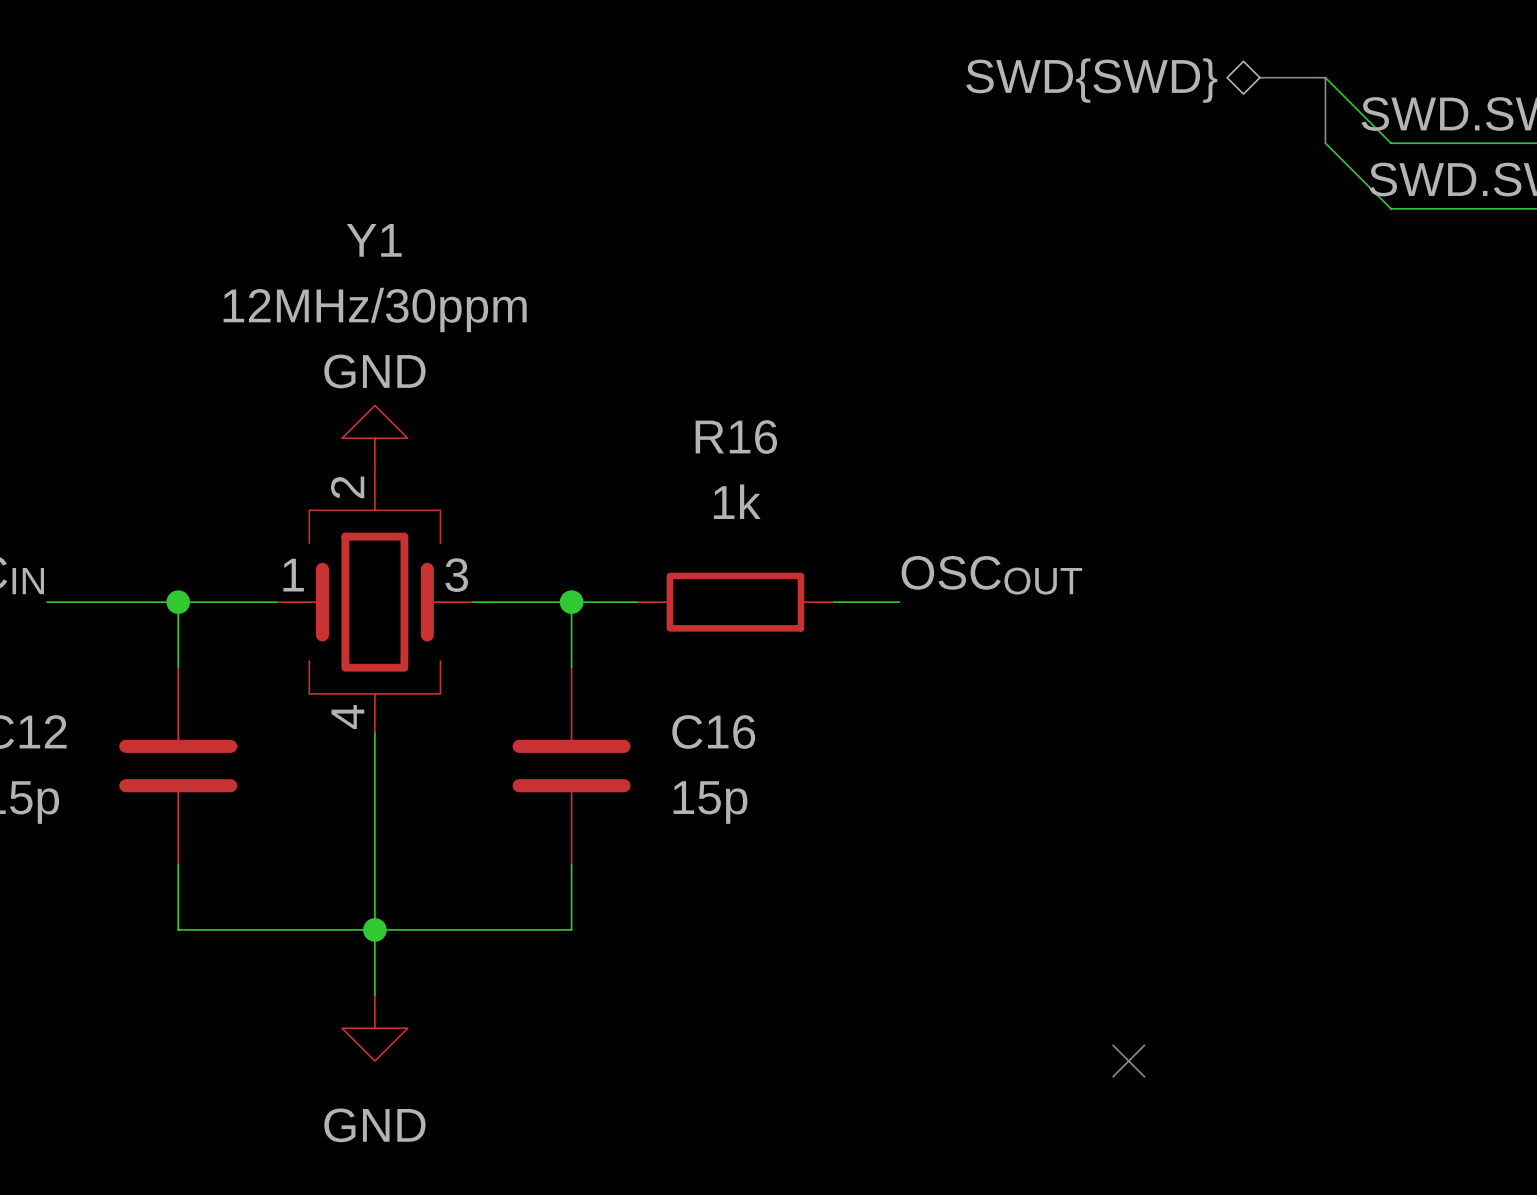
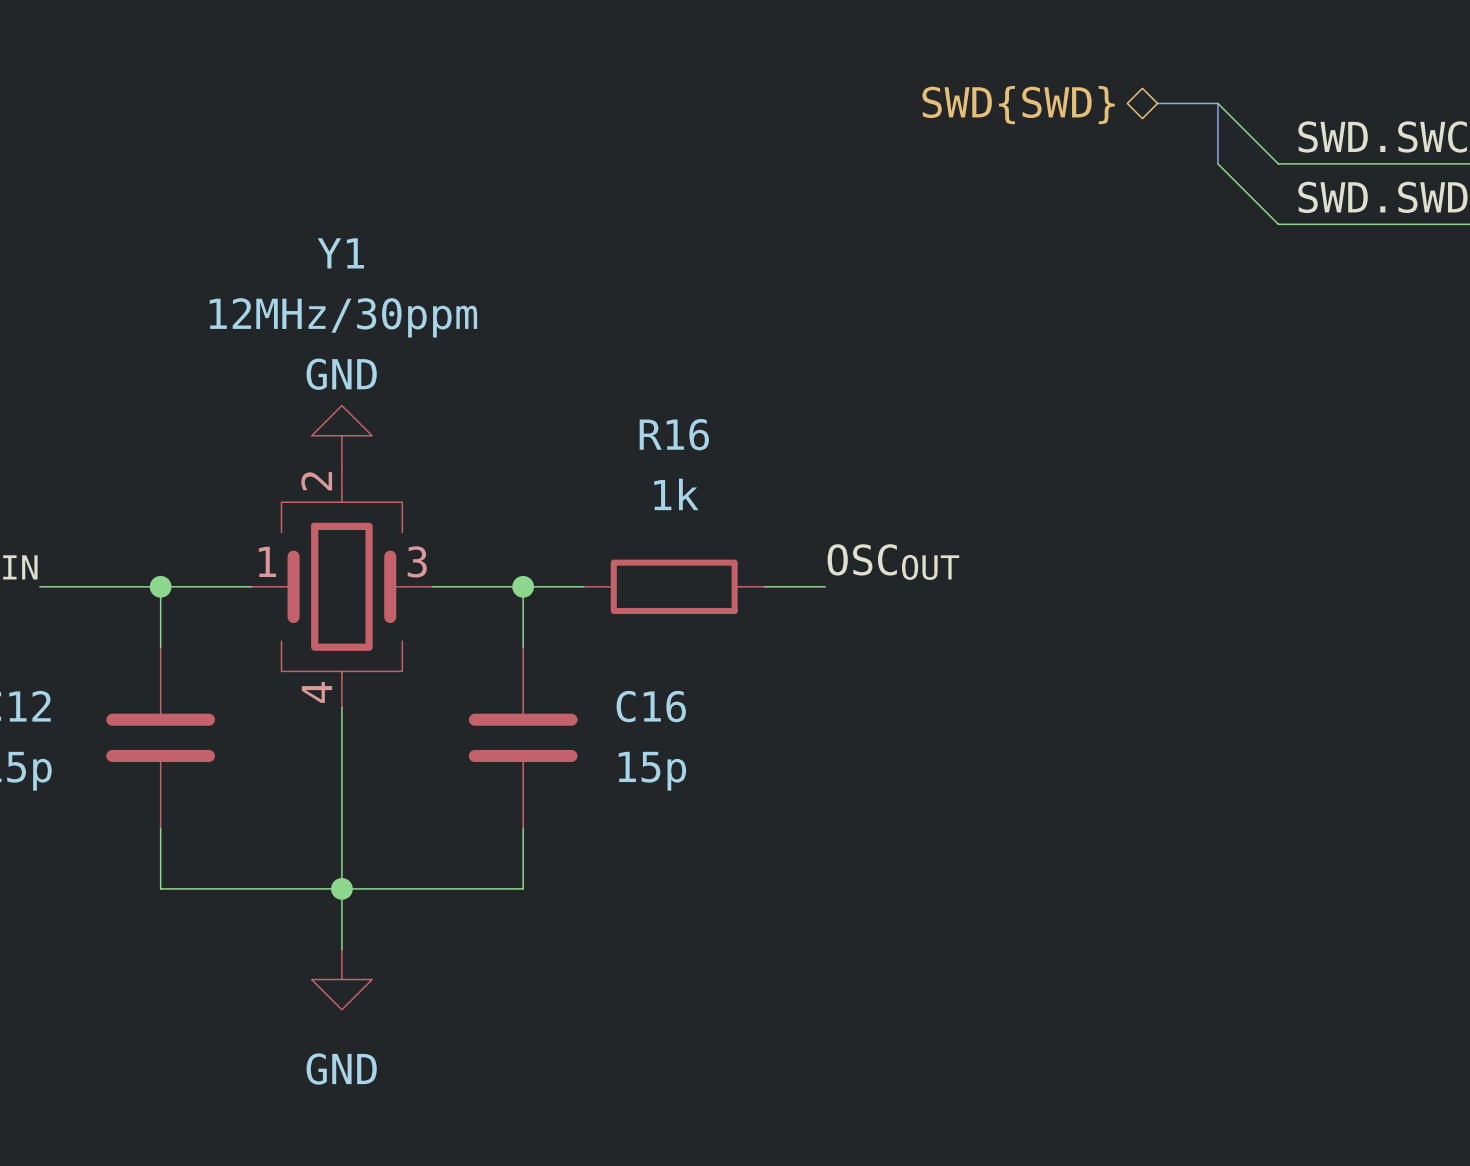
no-connect mark: (1128, 1061) -> none

